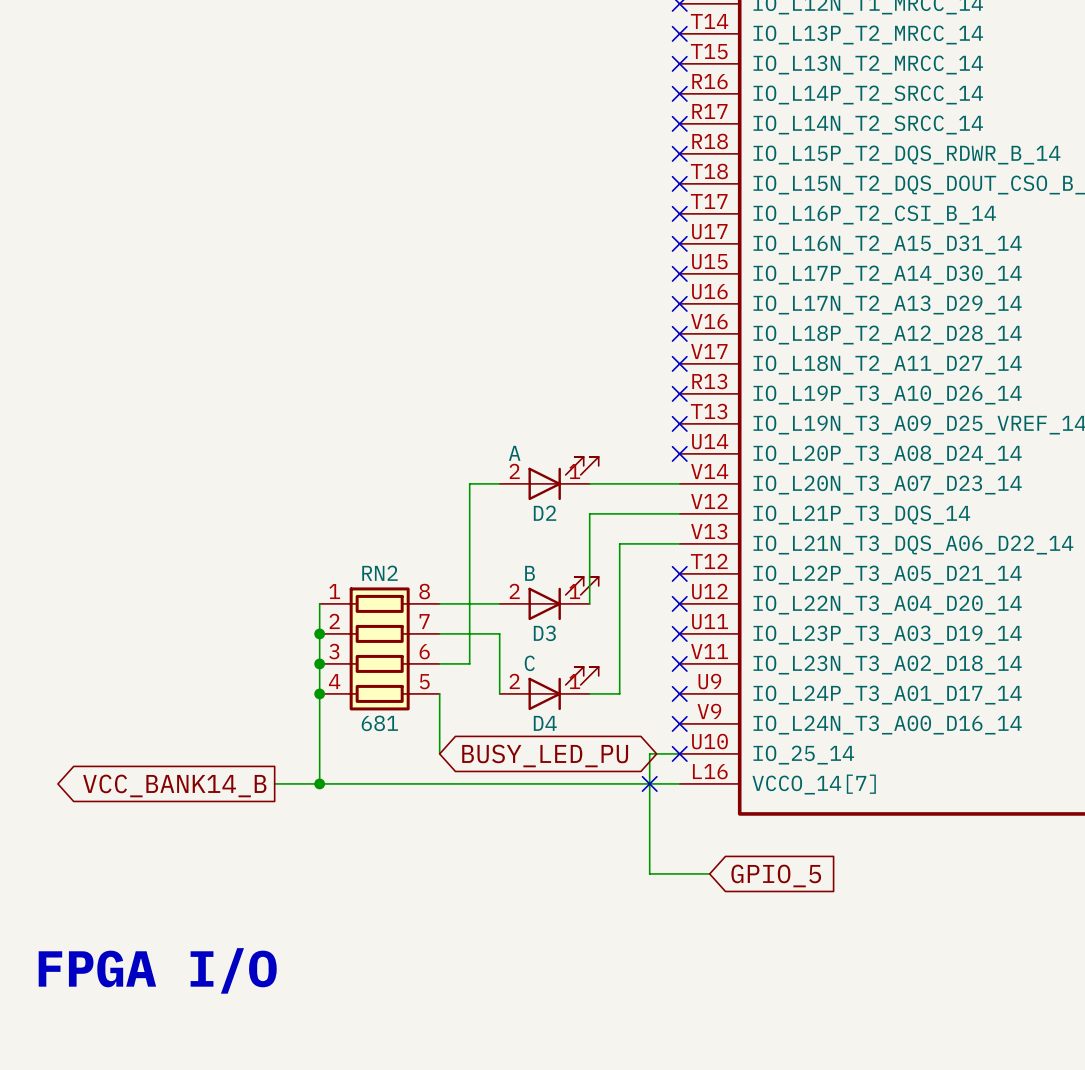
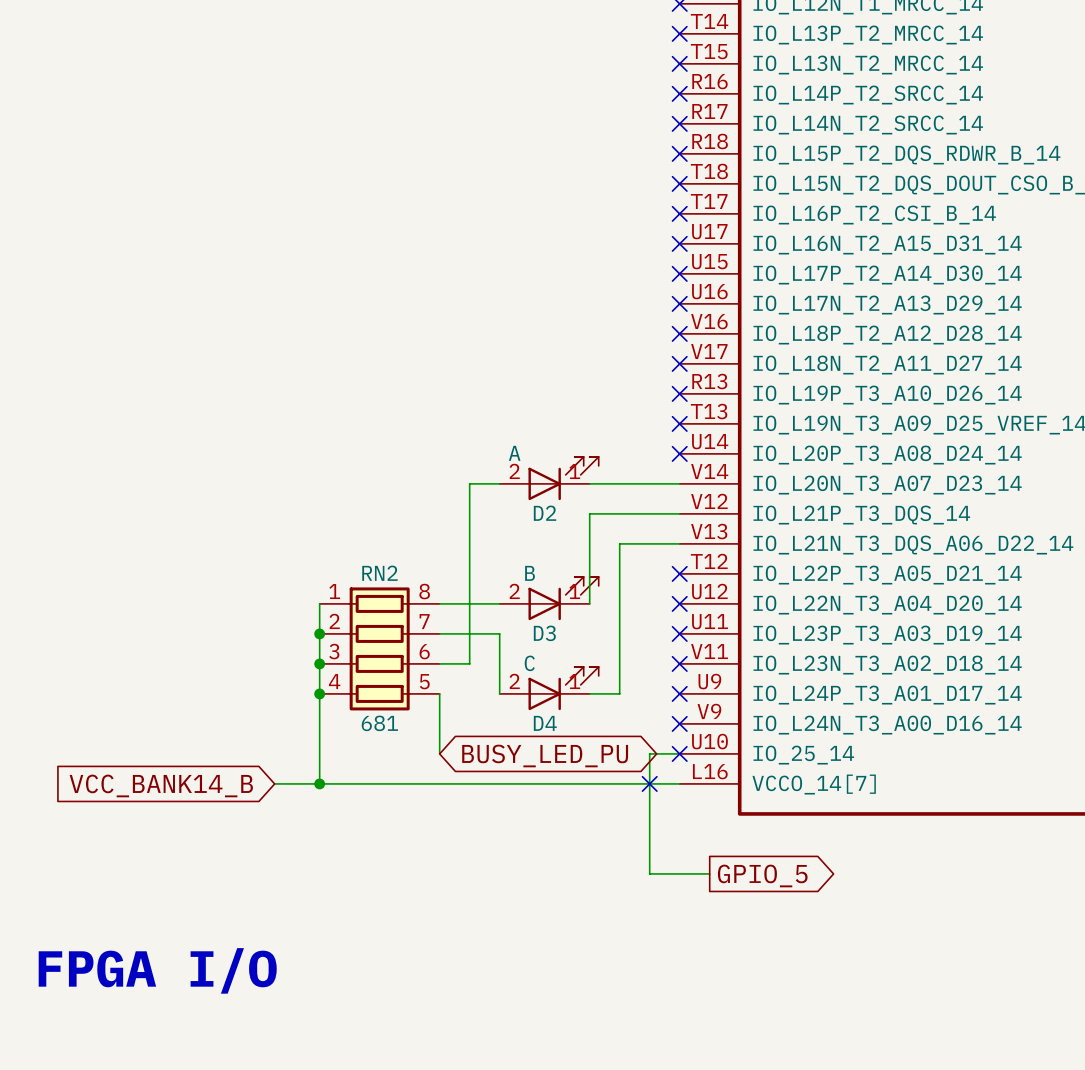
global label shape: output (174, 785) -> input (161, 785)
global label shape: input (776, 875) -> output (762, 875)

